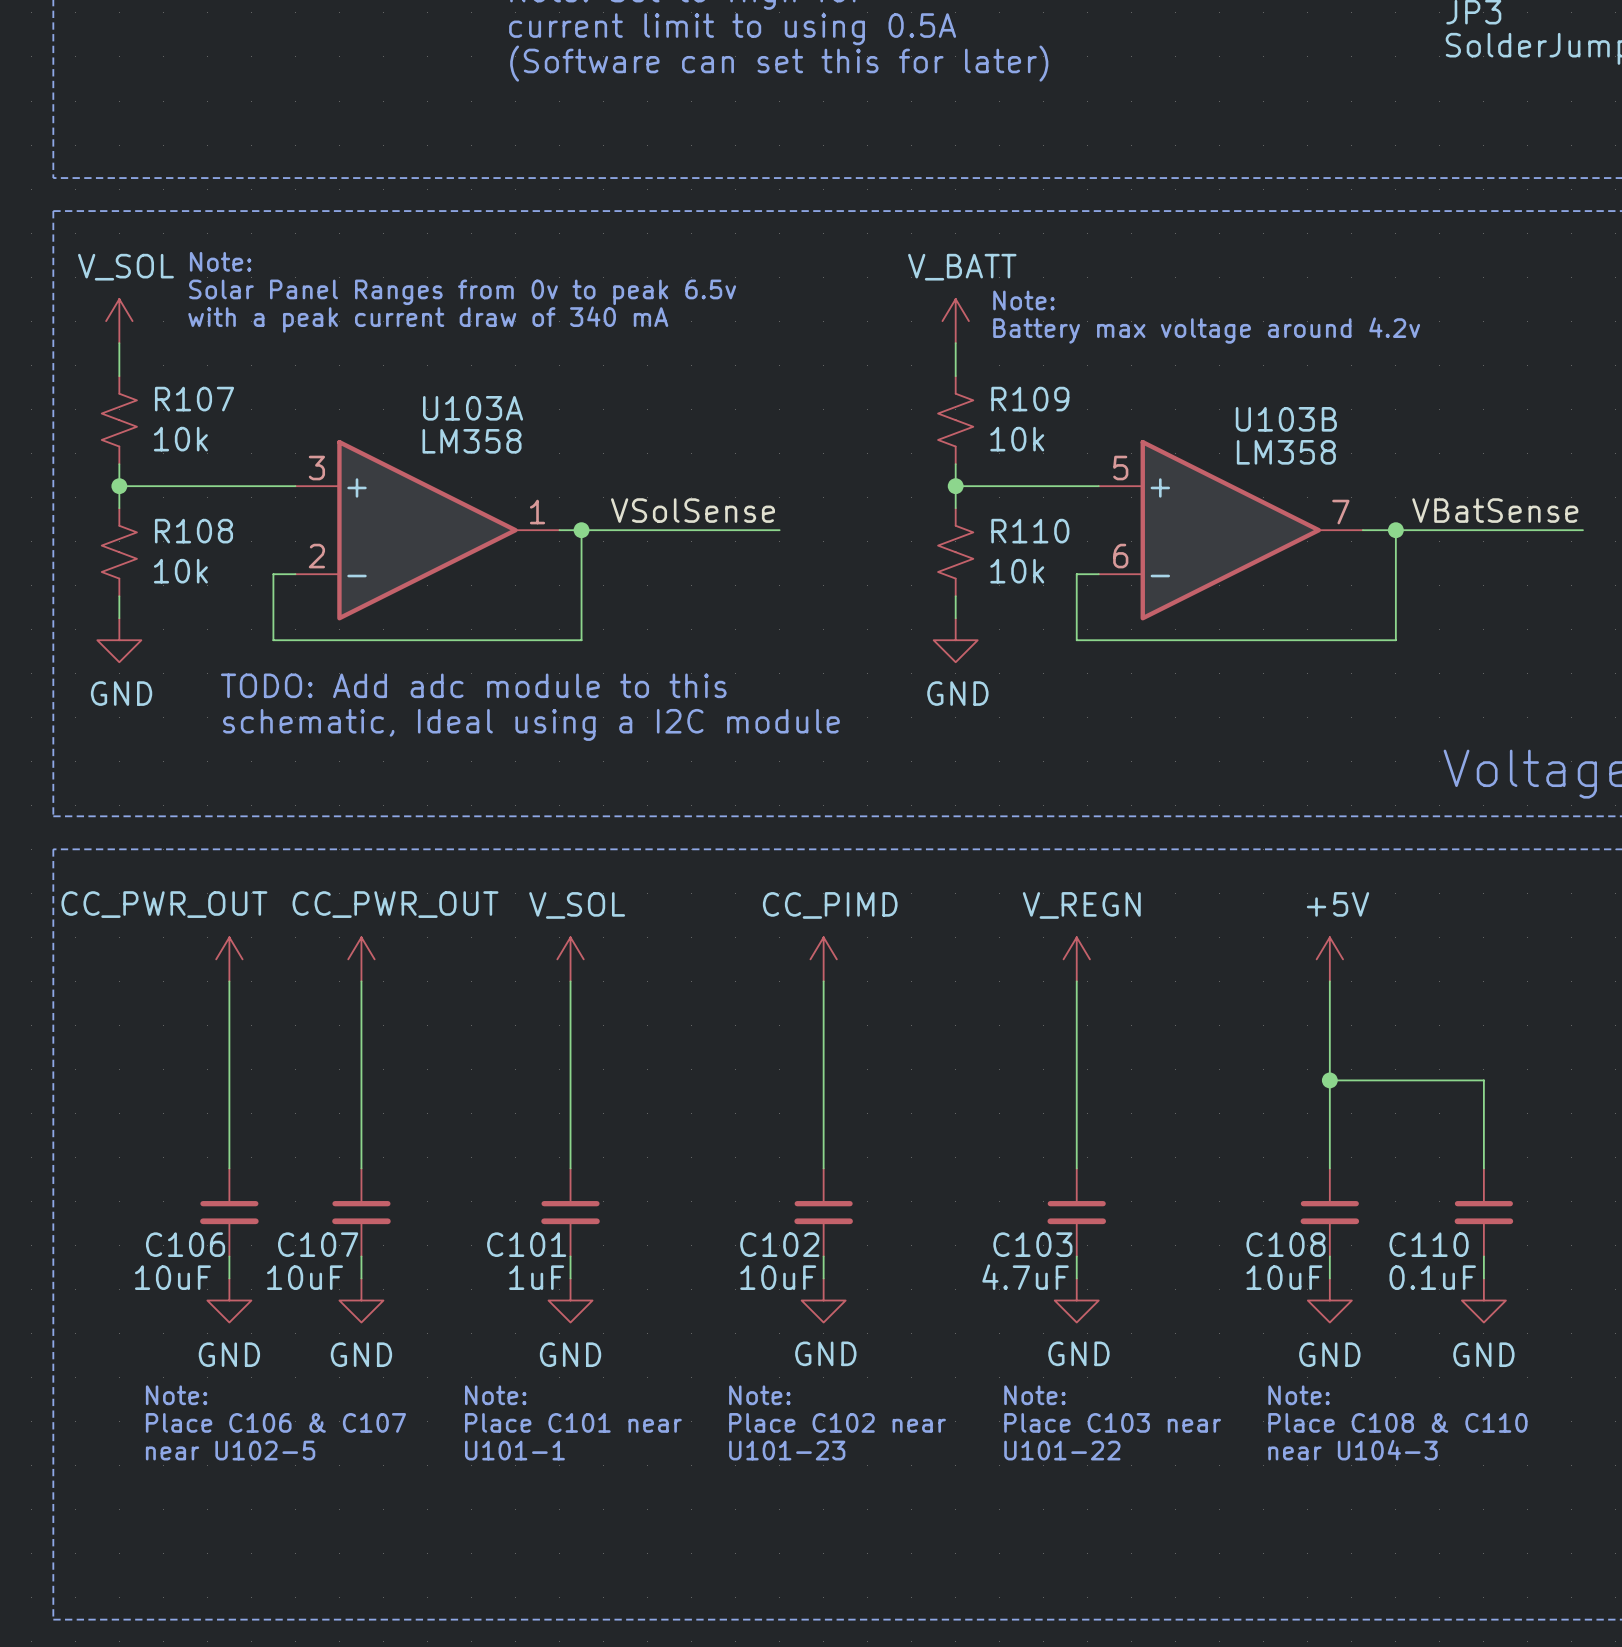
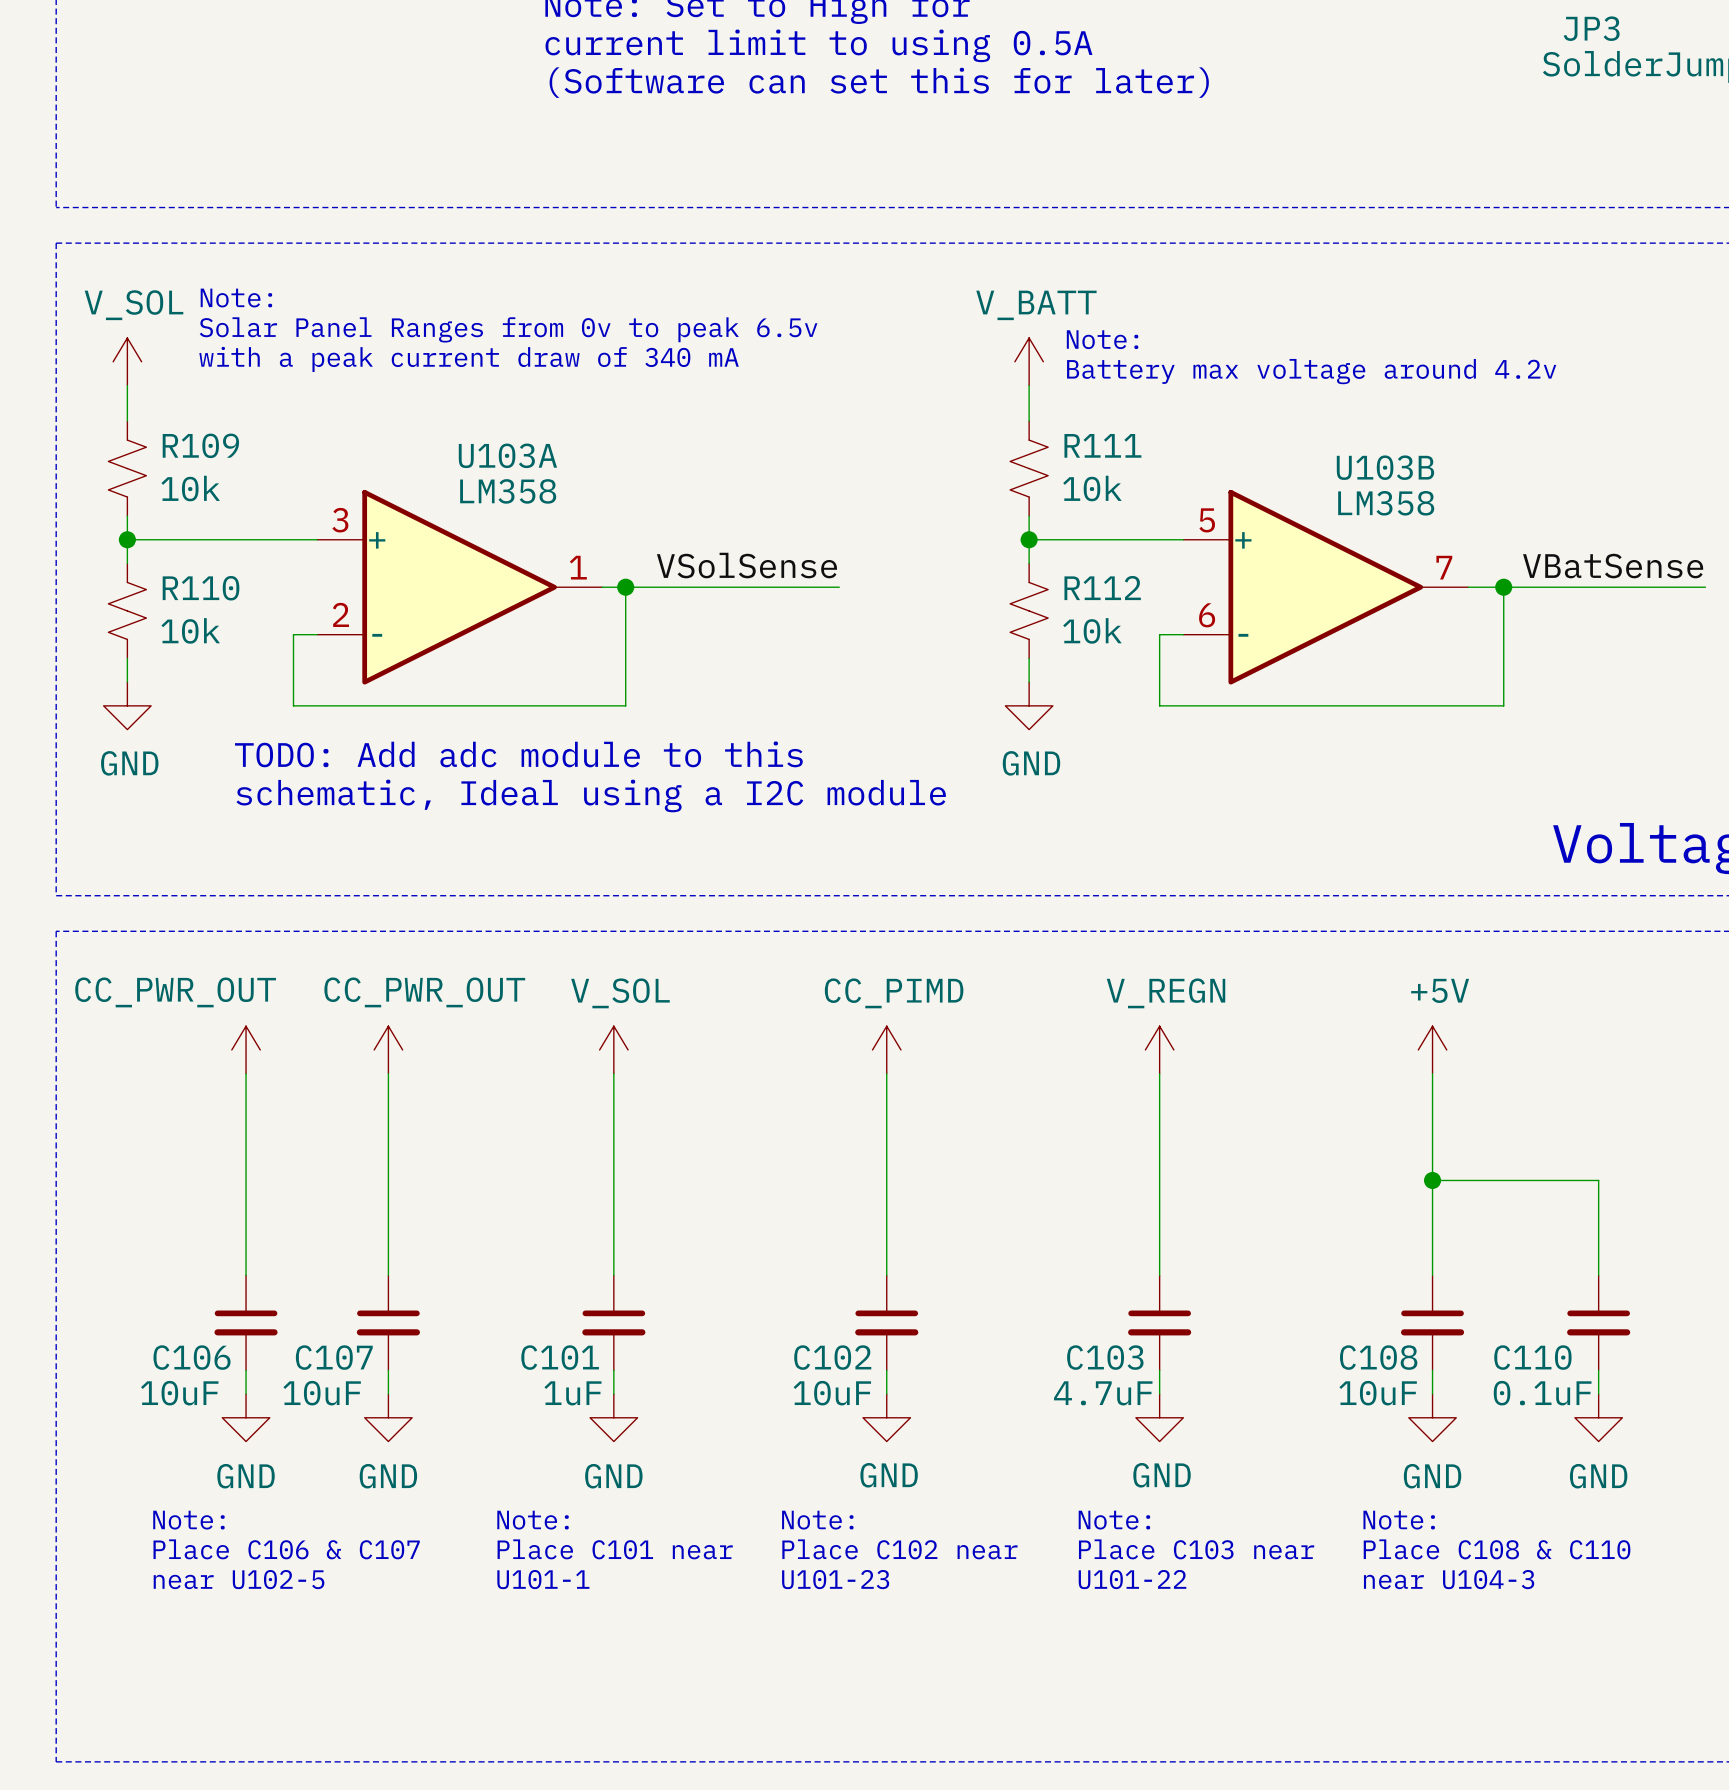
R107 name: R107 (194, 399) -> R109 (200, 445)
R109 name: R109 (1030, 399) -> R111 (1102, 445)
R108 name: R108 (193, 531) -> R110 (201, 588)
R110 name: R110 (1030, 531) -> R112 (1102, 588)

